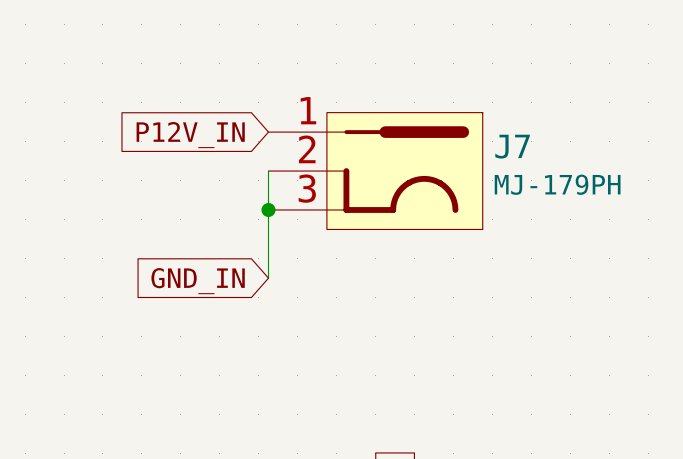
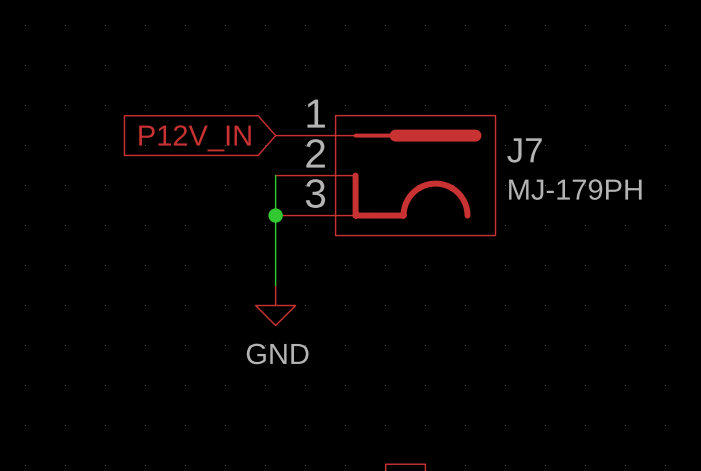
global label: GND_IN (198, 281) -> none
power symbol: none -> GND (275, 305)

